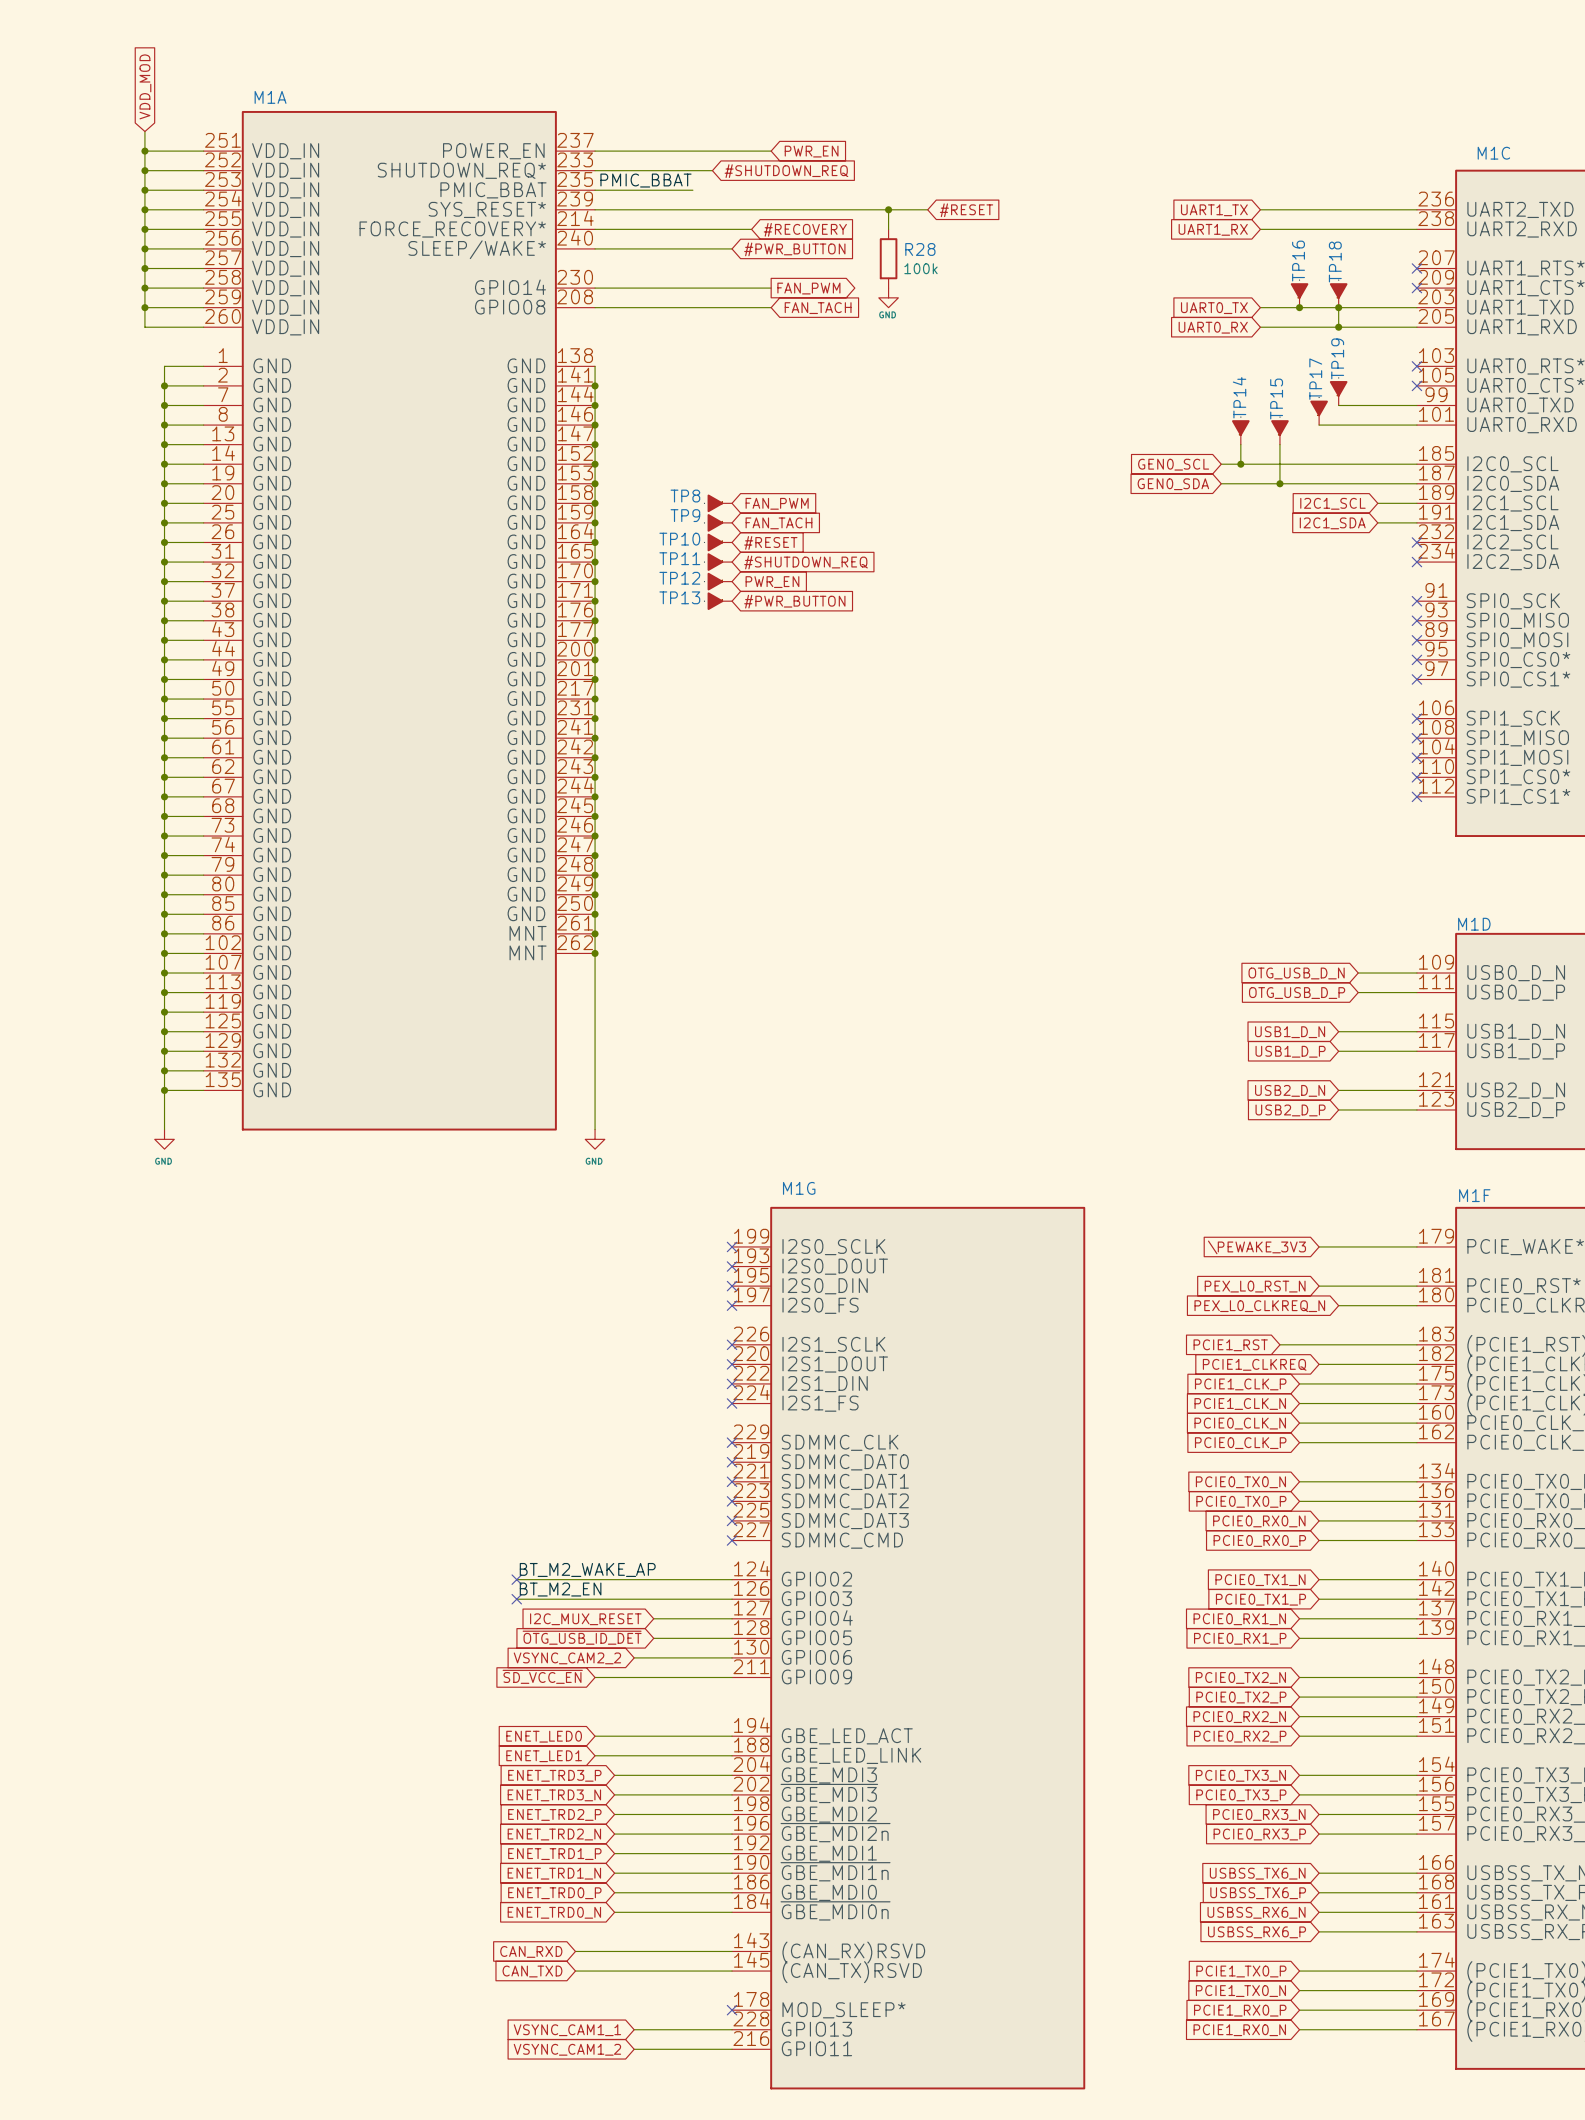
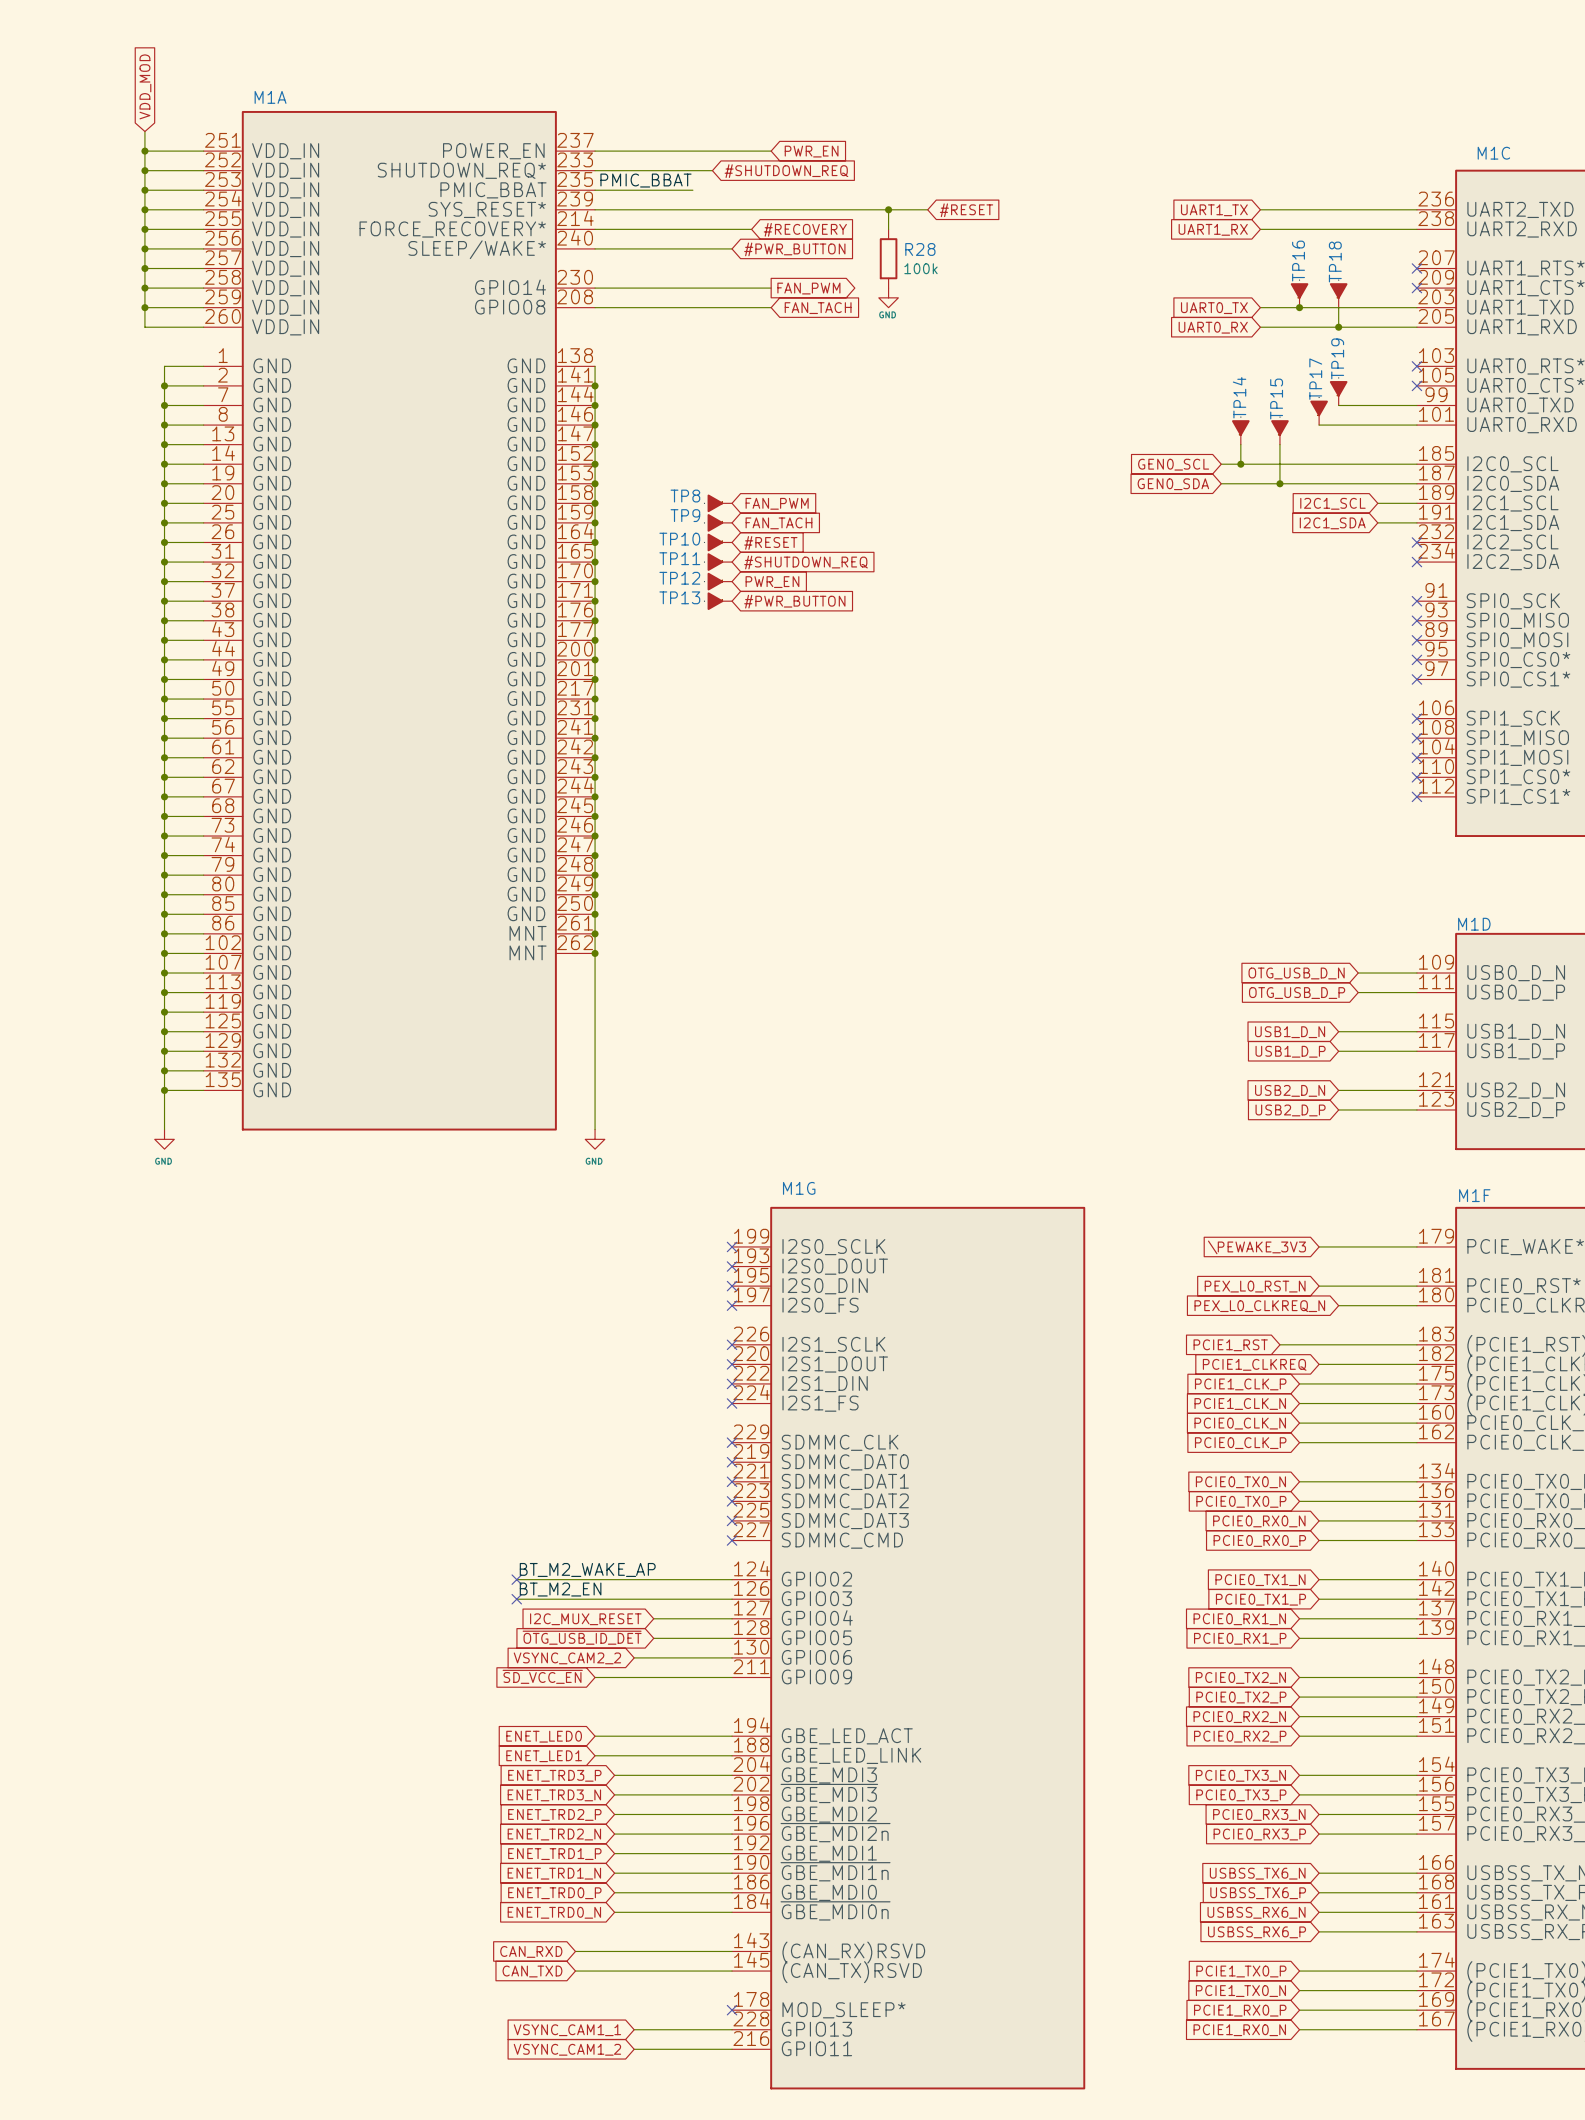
junction: (1338, 307) -> none

